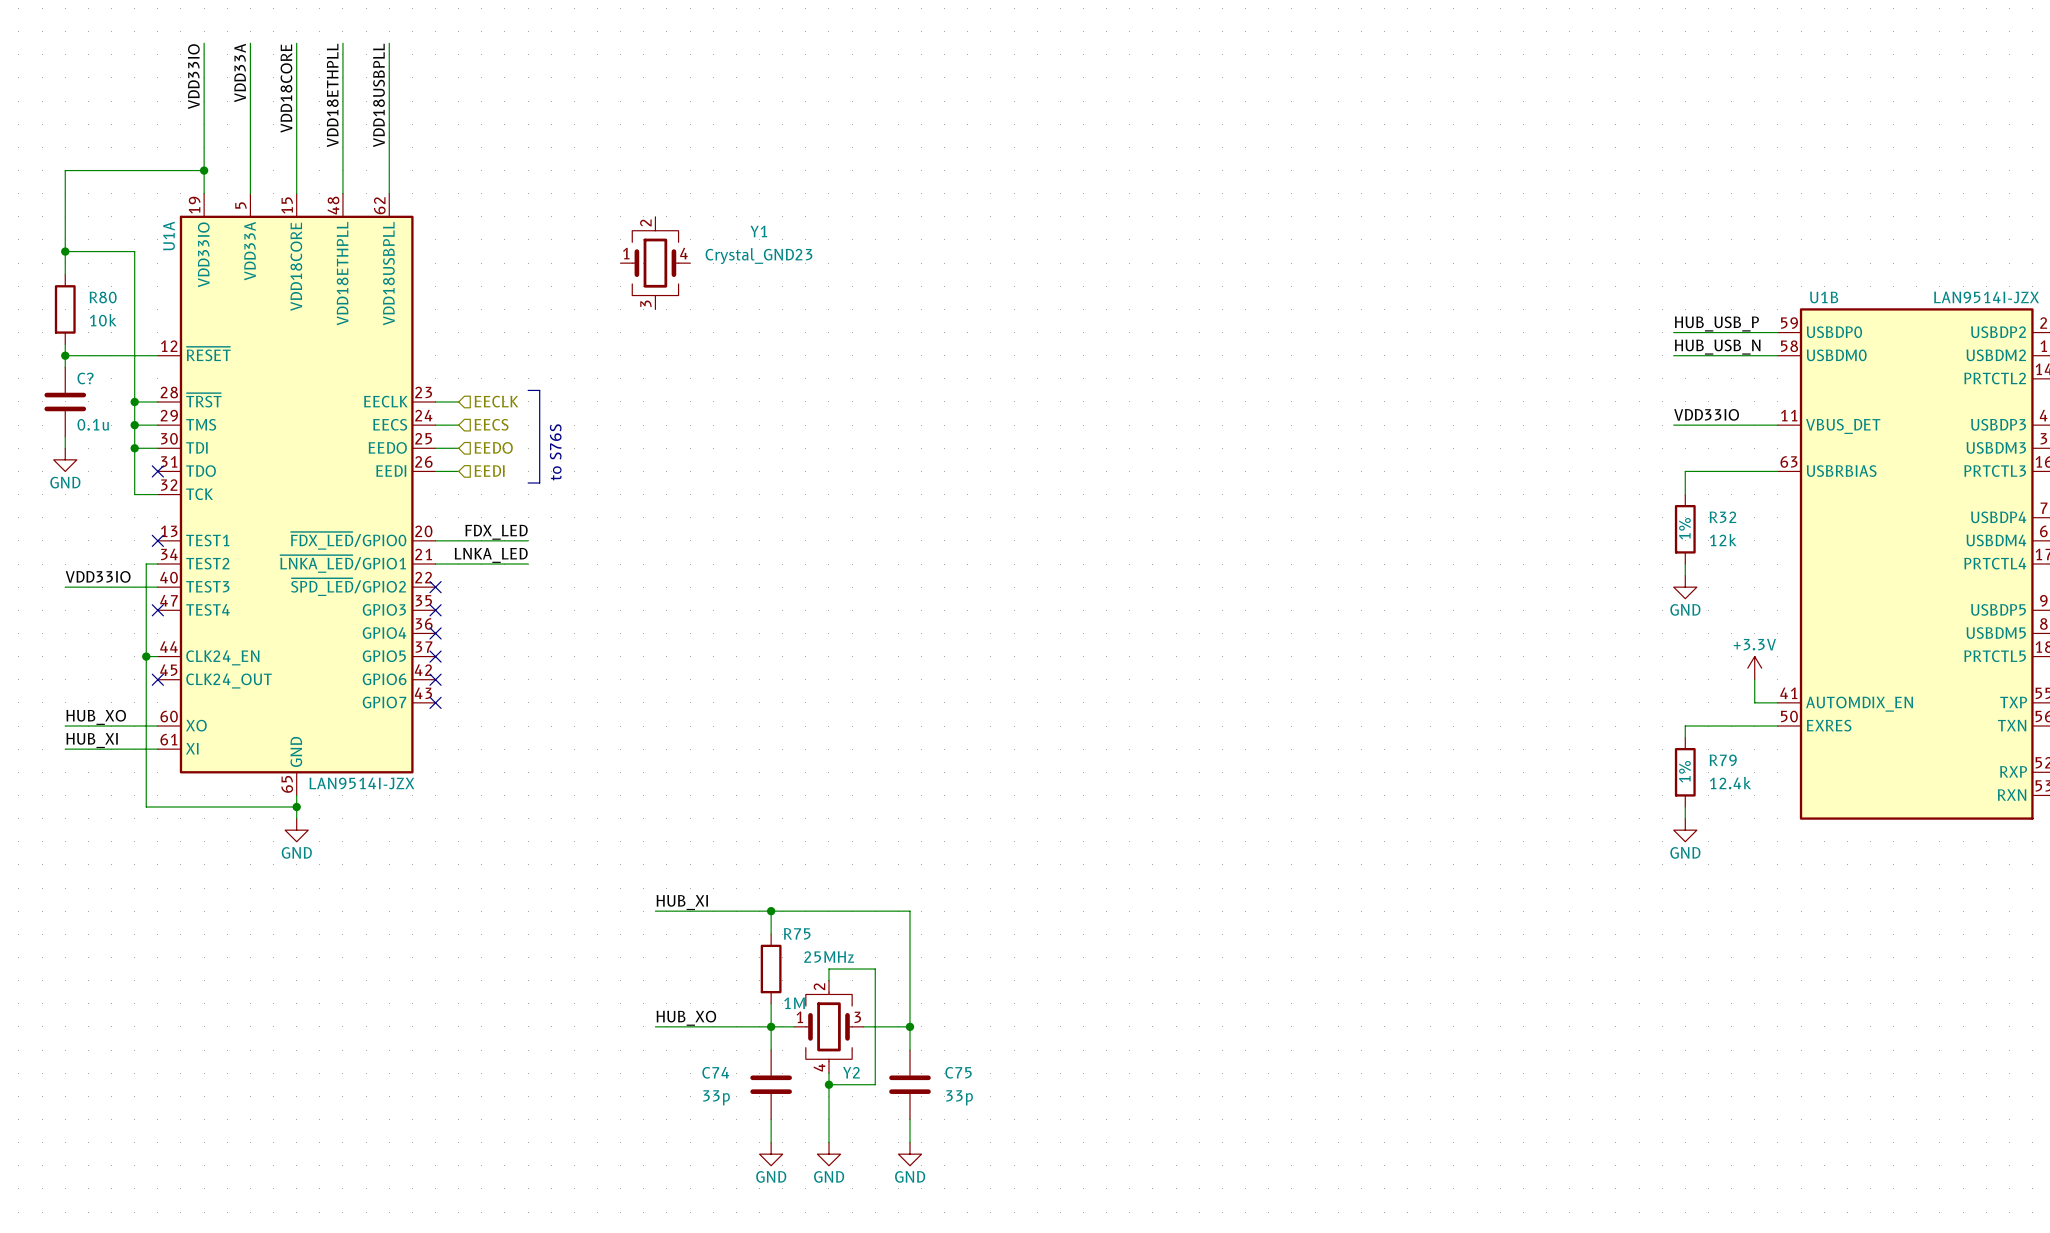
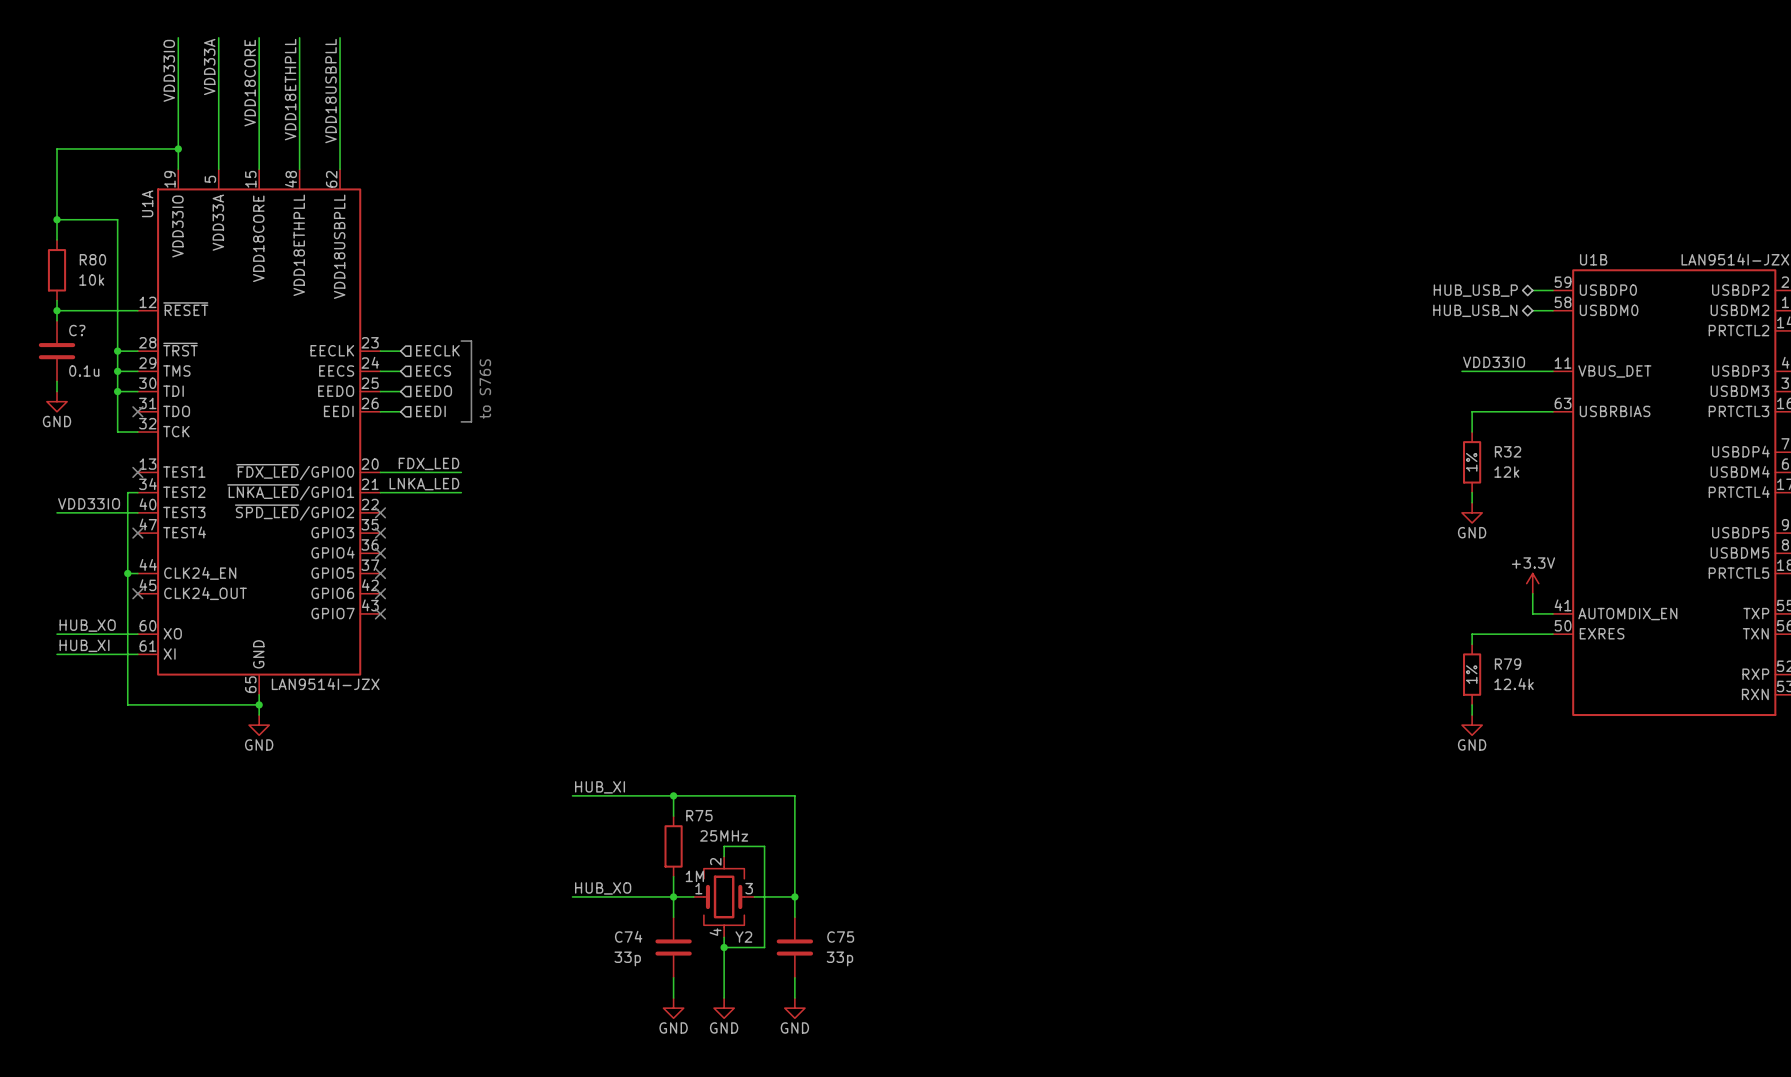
Y1: Crystal_GND23 (655, 263) -> none
label: HUB_USB_P (1716, 323) -> none
wire: (1673, 332) (1754, 332) -> none
hierarchical label: none -> HUB_USB_P (1475, 290)
label: HUB_USB_N (1717, 347) -> none
wire: (1673, 355) (1754, 355) -> none
hierarchical label: none -> HUB_USB_N (1475, 310)

